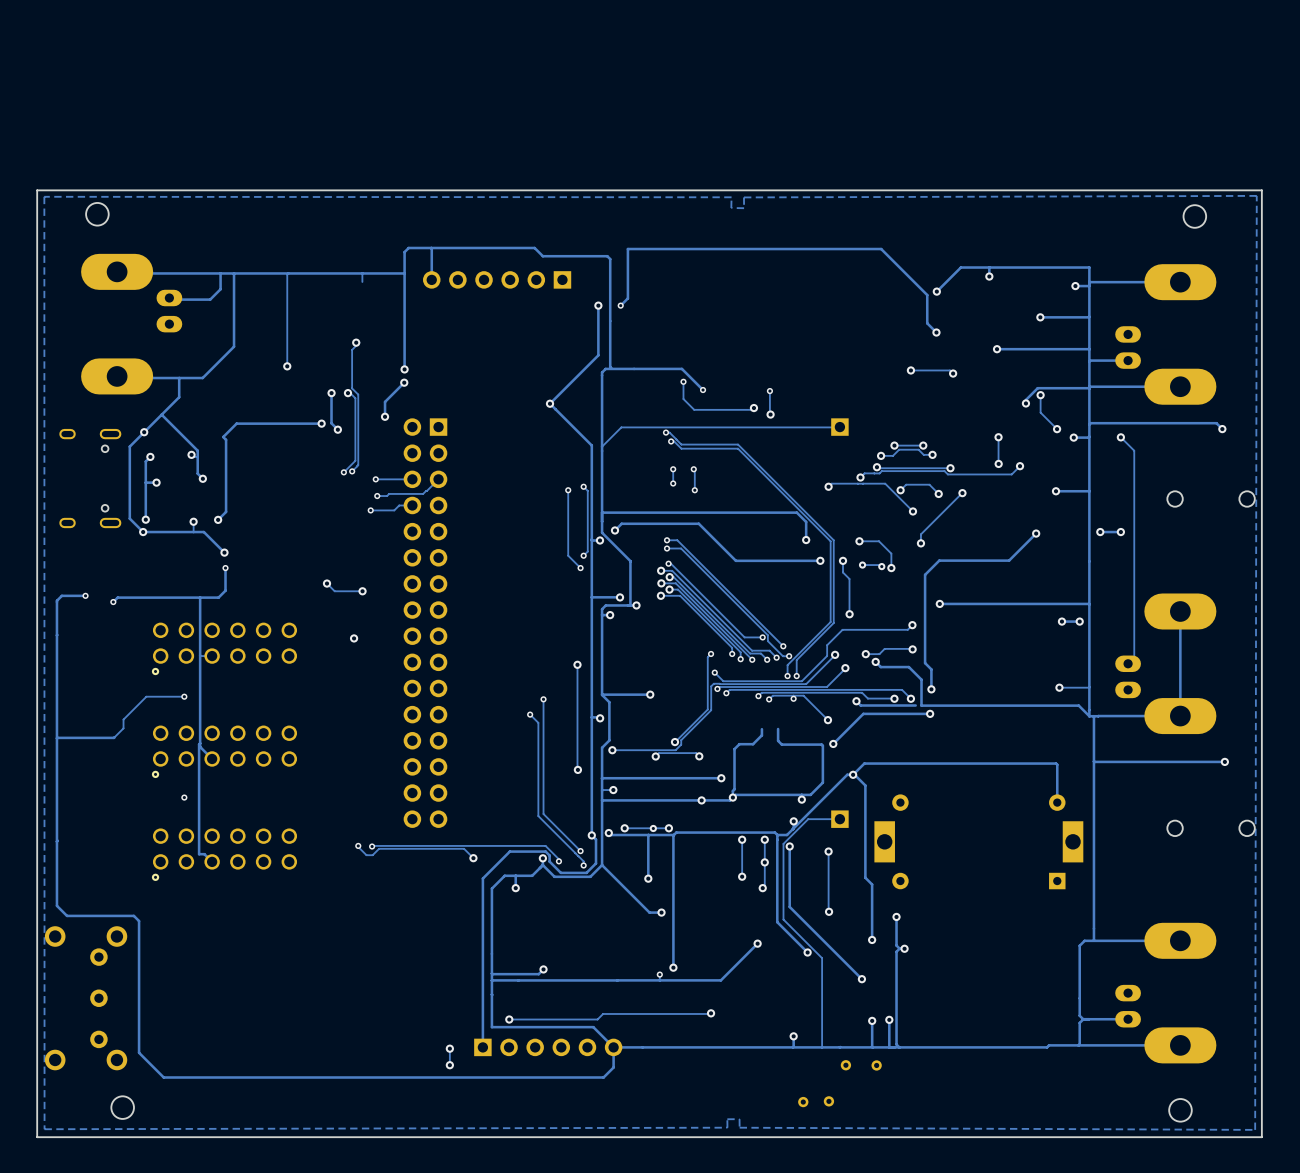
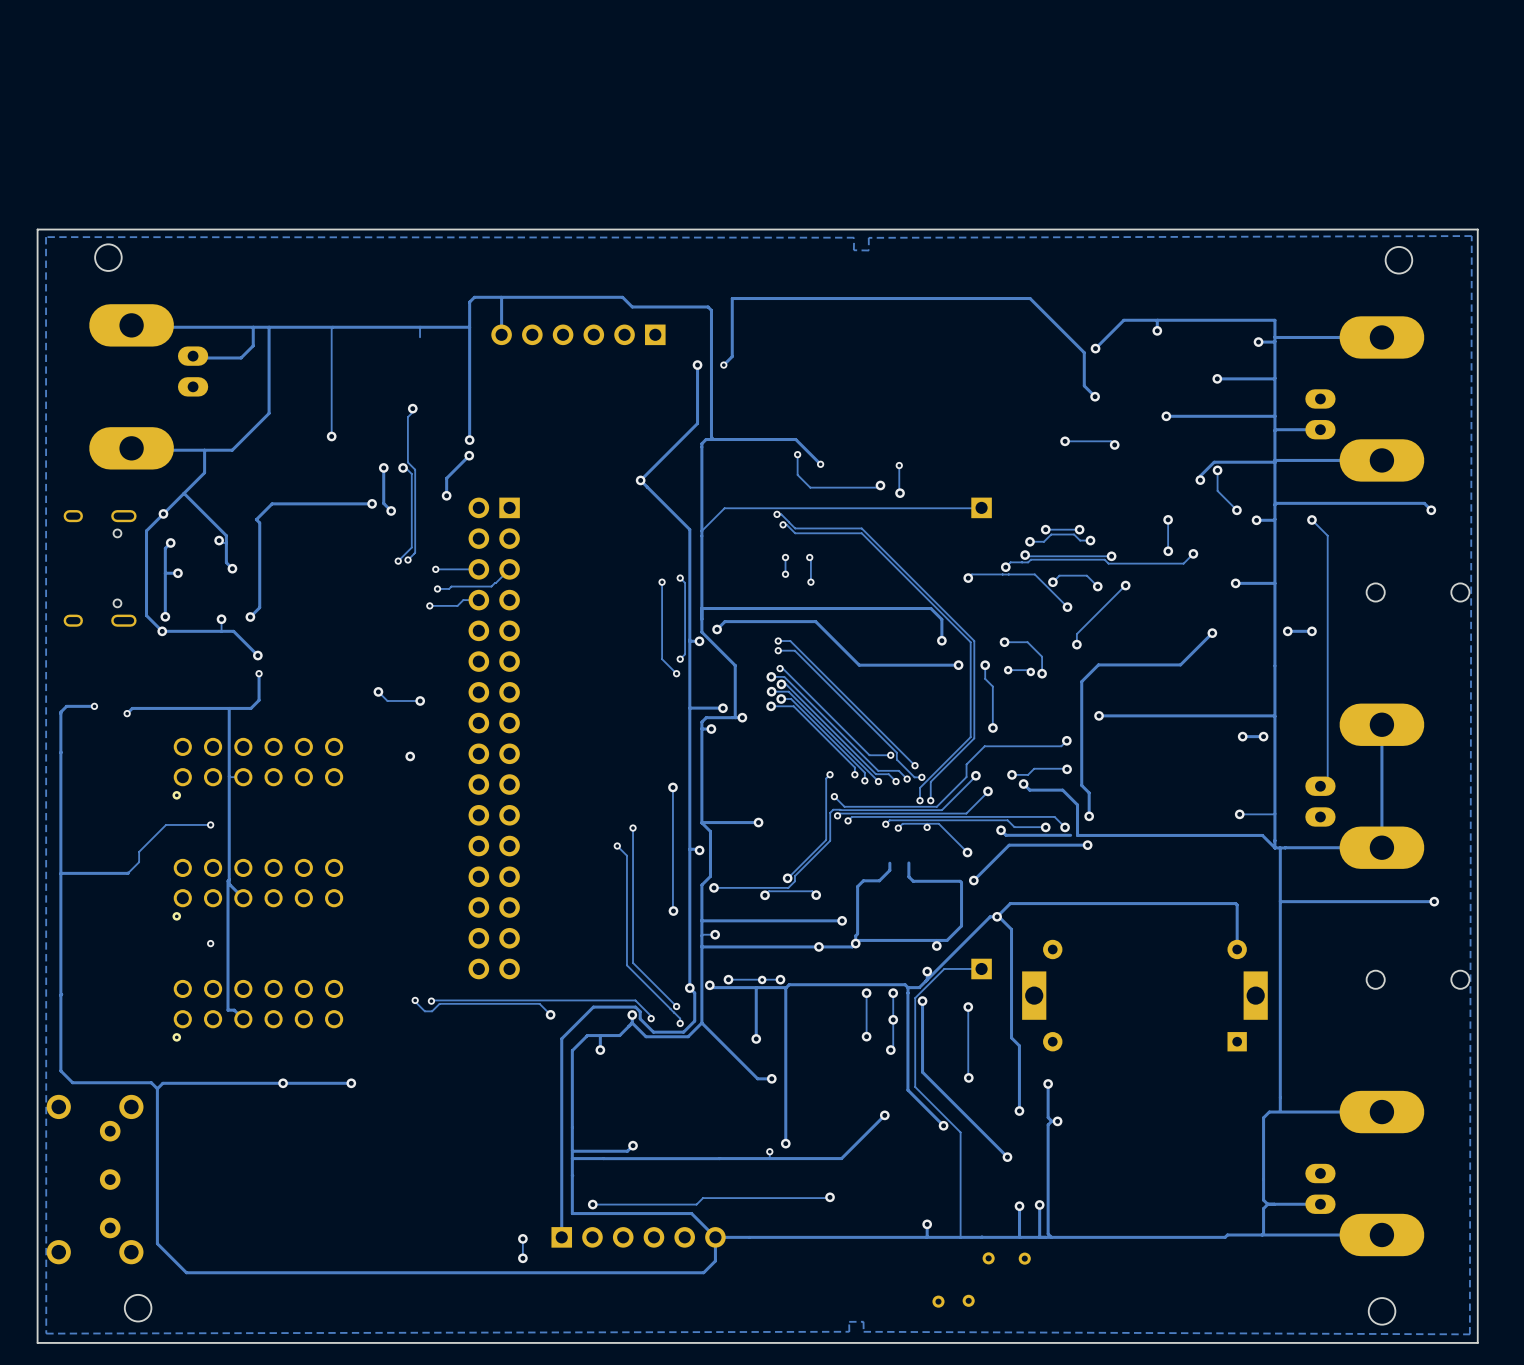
via: none -> (283, 1083)
track: none -> (351, 1083) (162, 1083) (157, 1088)
via: none -> (351, 1083)

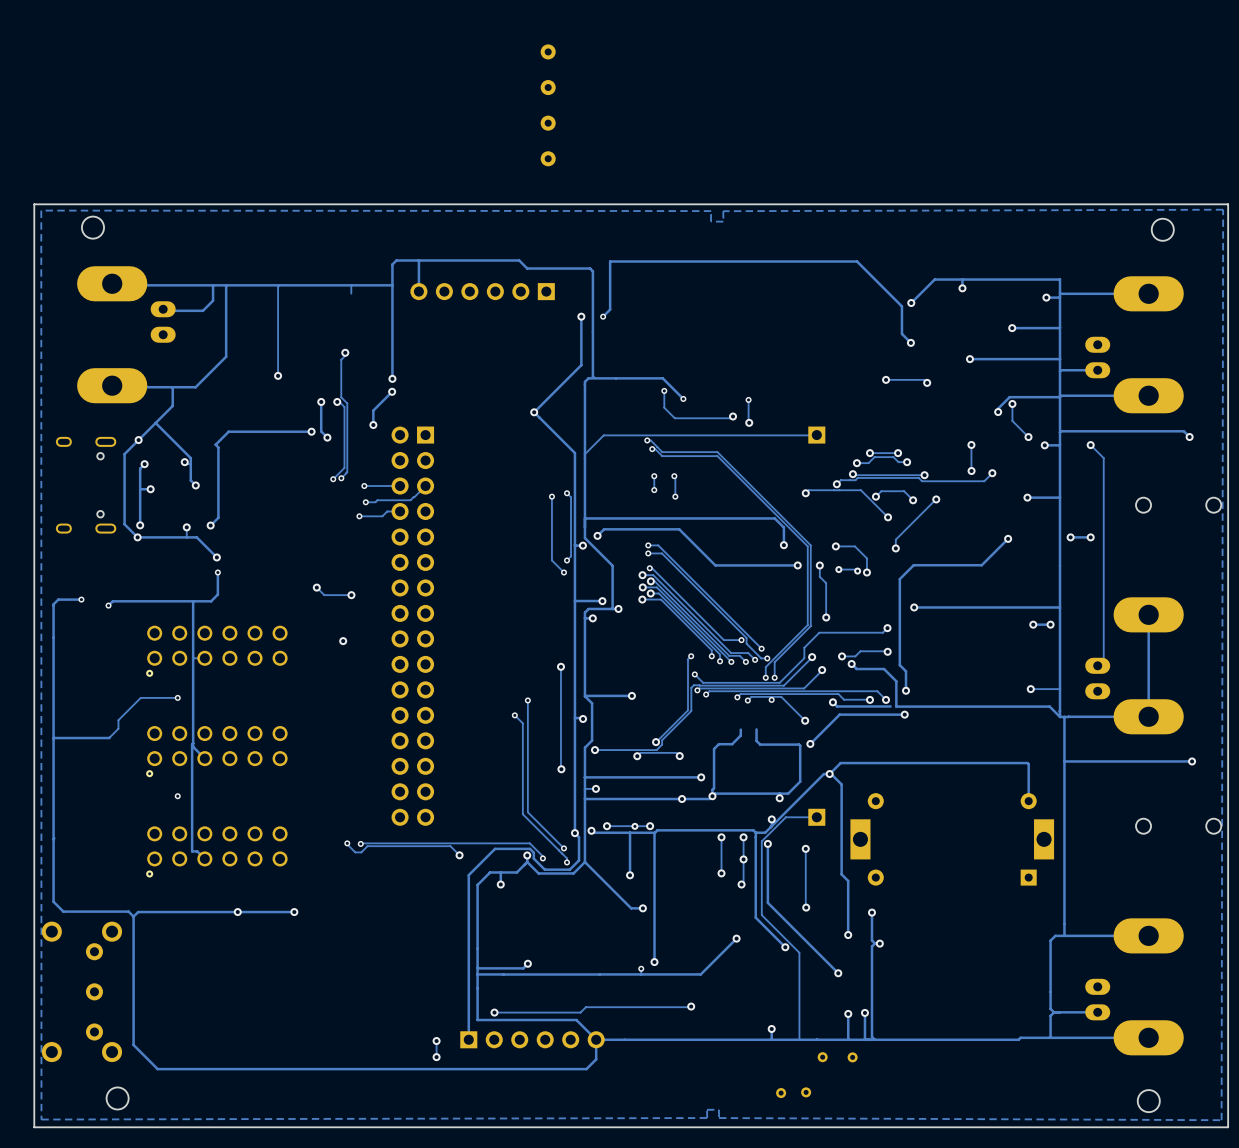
part: none -> (548, 51)
part: none -> (548, 87)
part: none -> (548, 123)
part: none -> (548, 158)

